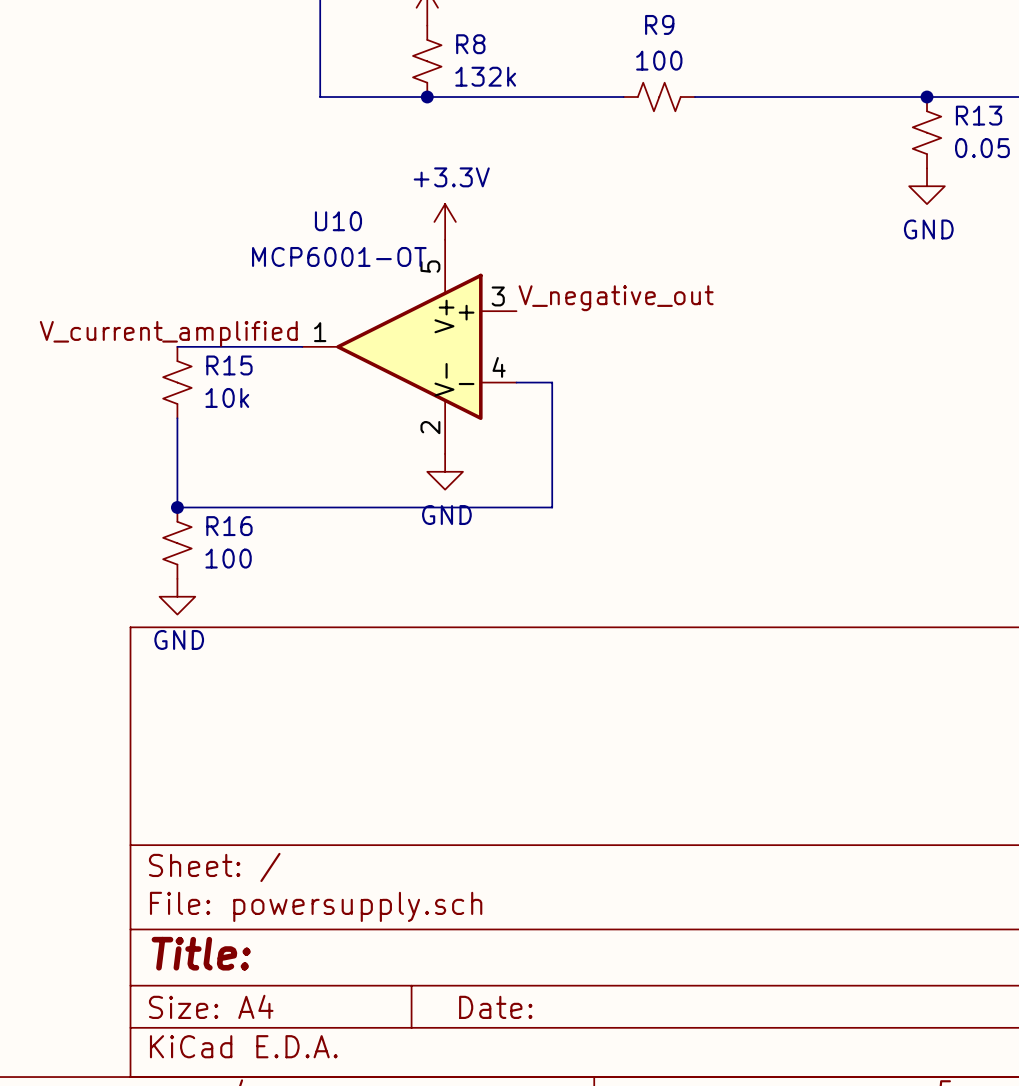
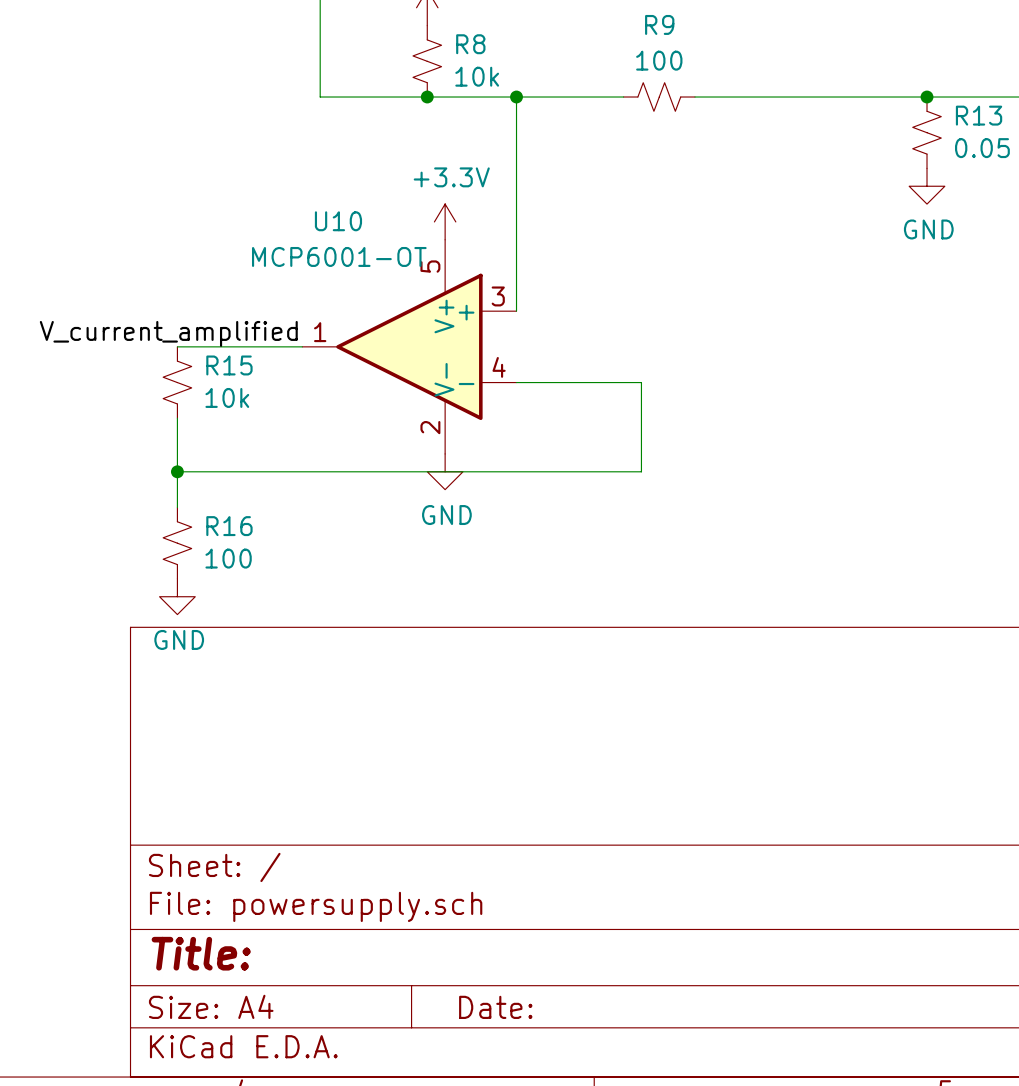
R8 value: 132k (485, 76) -> 10k (477, 76)
wire: none -> (516, 97) (516, 311)
junction: none -> (516, 97)
label: V_negative_out (616, 298) -> none
wire: (552, 382) (552, 507) (177, 507) -> (552, 382) (641, 382) (641, 471) (177, 471)
junction position: (177, 507) -> (177, 471)

